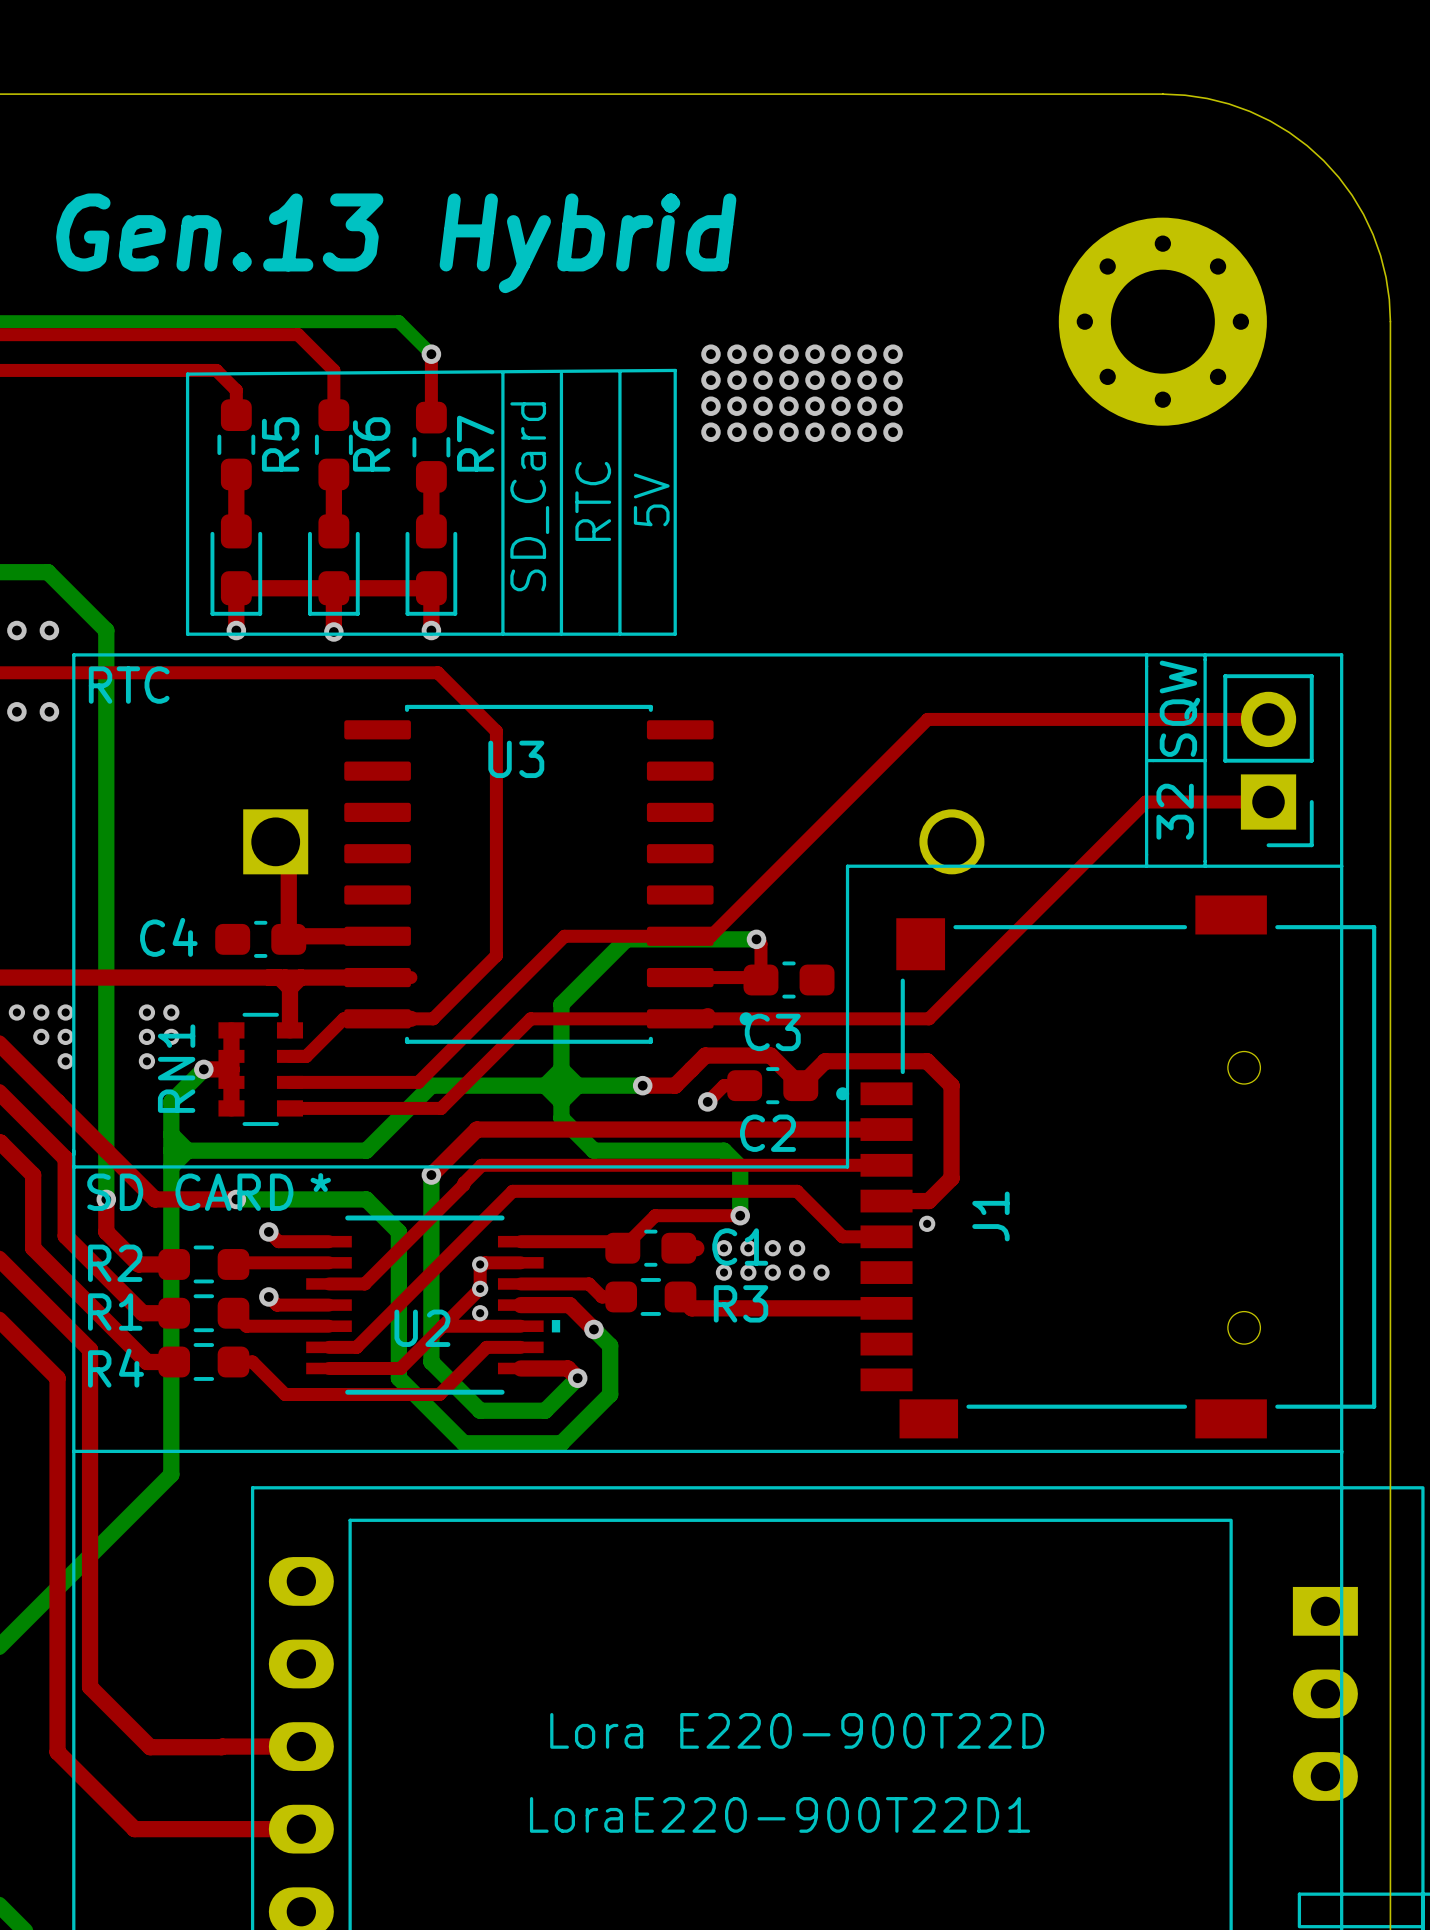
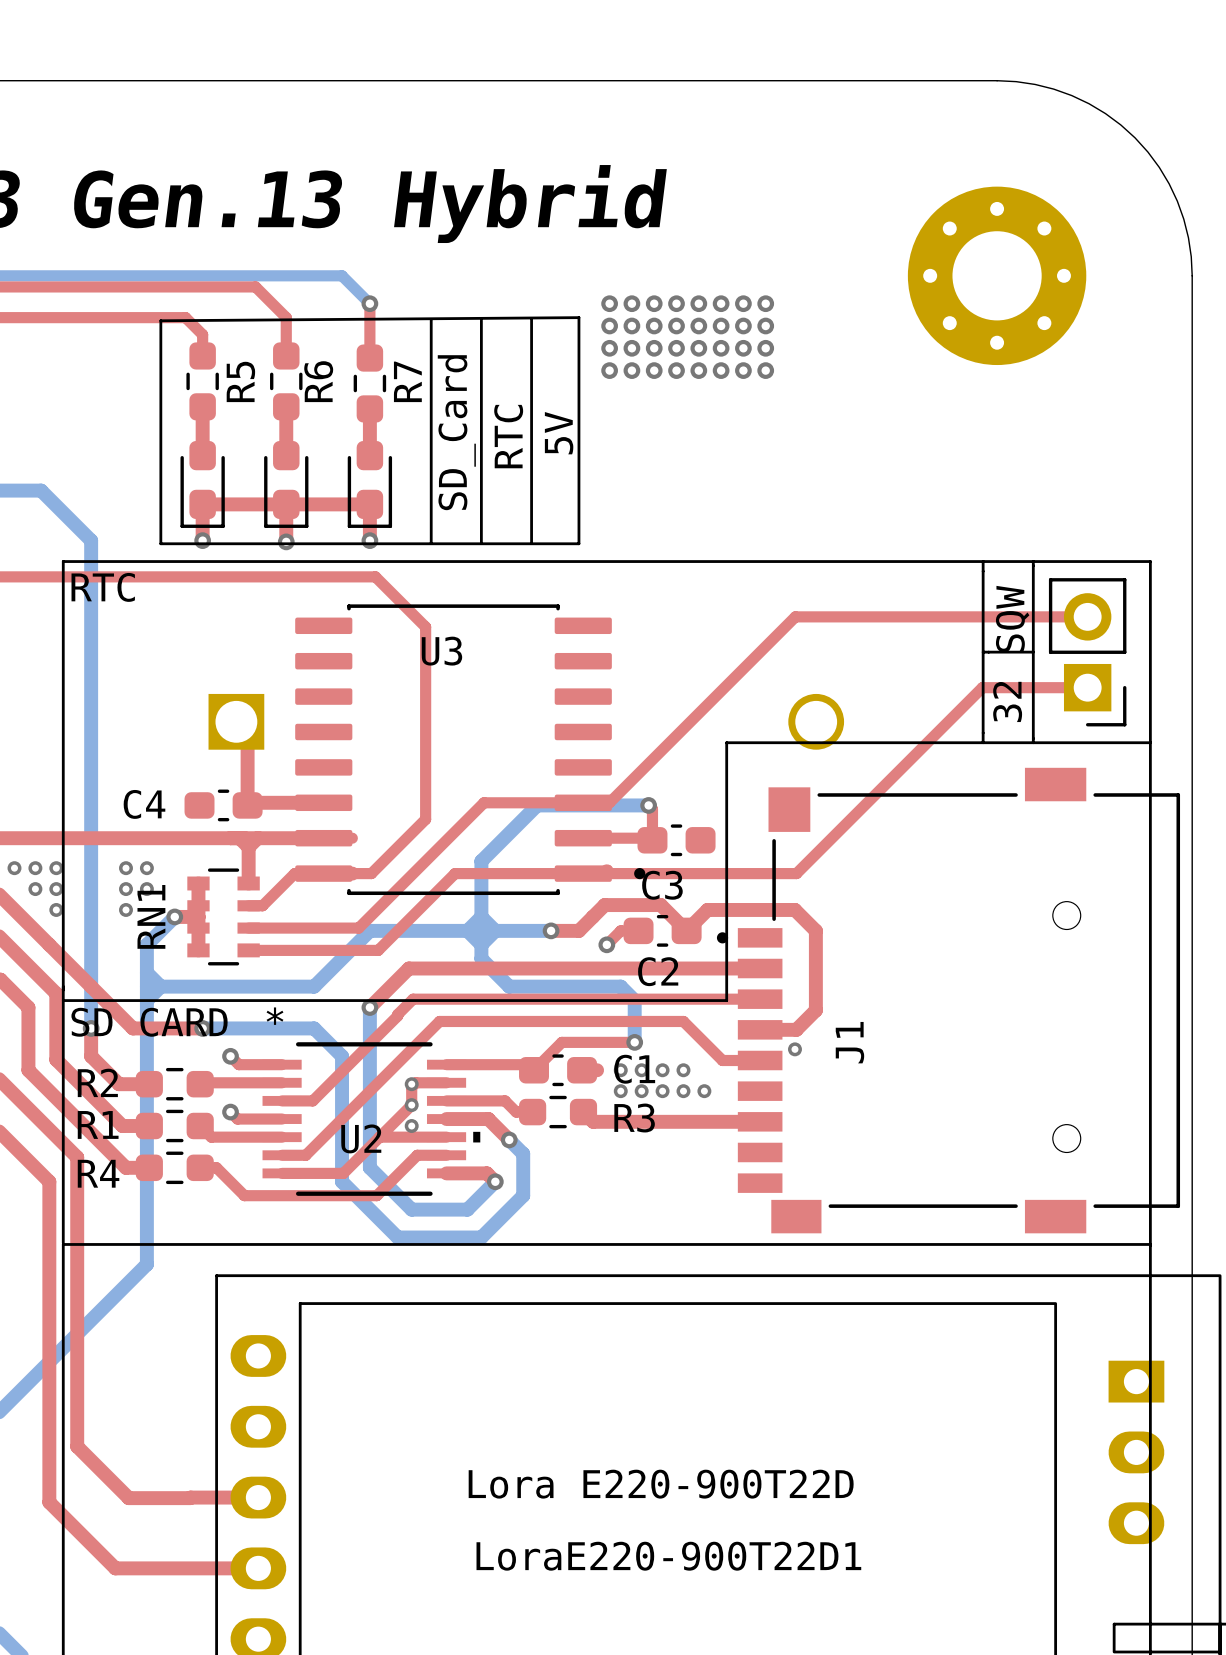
via: (16, 630) -> none
via: (49, 630) -> none
via: (16, 711) -> none
via: (49, 711) -> none

